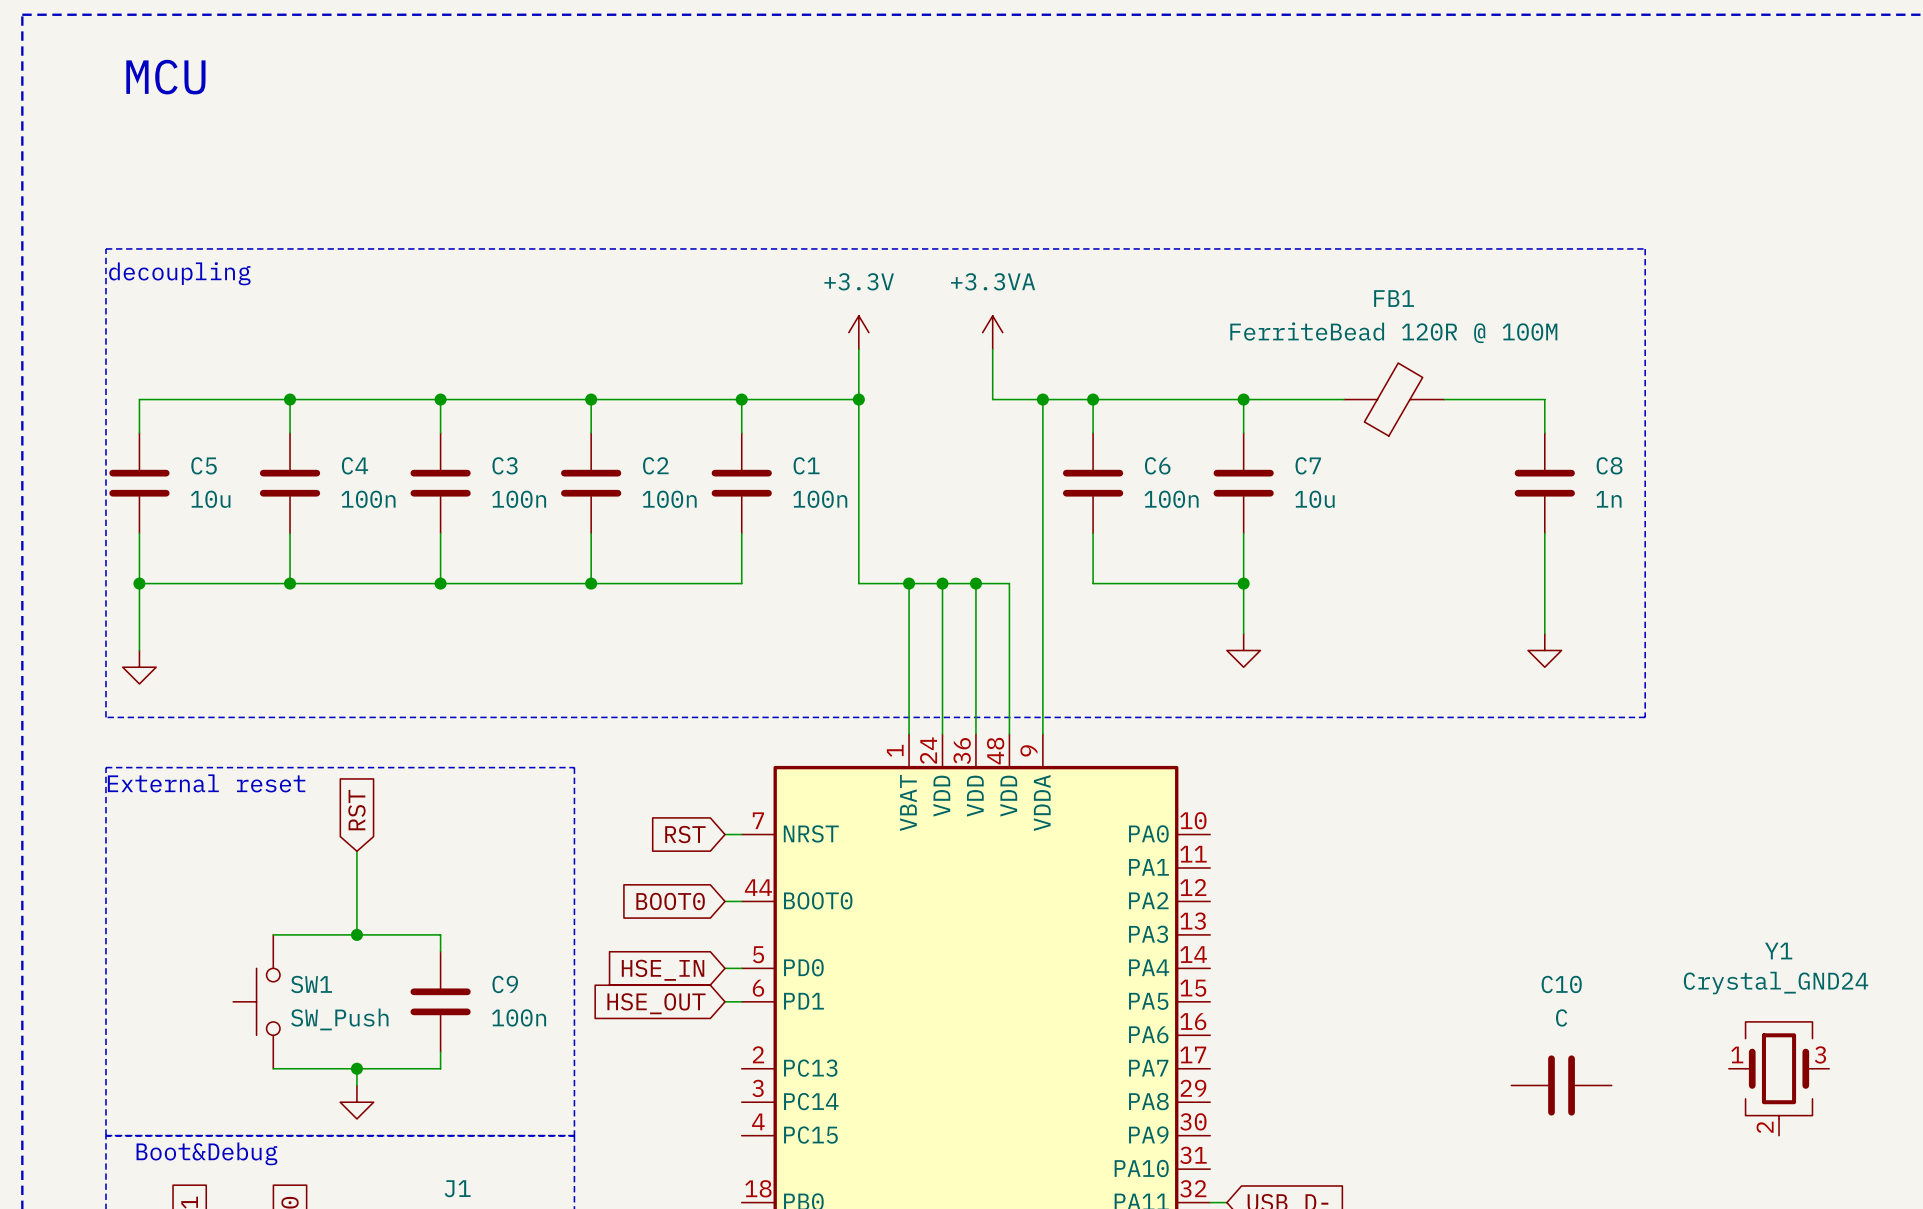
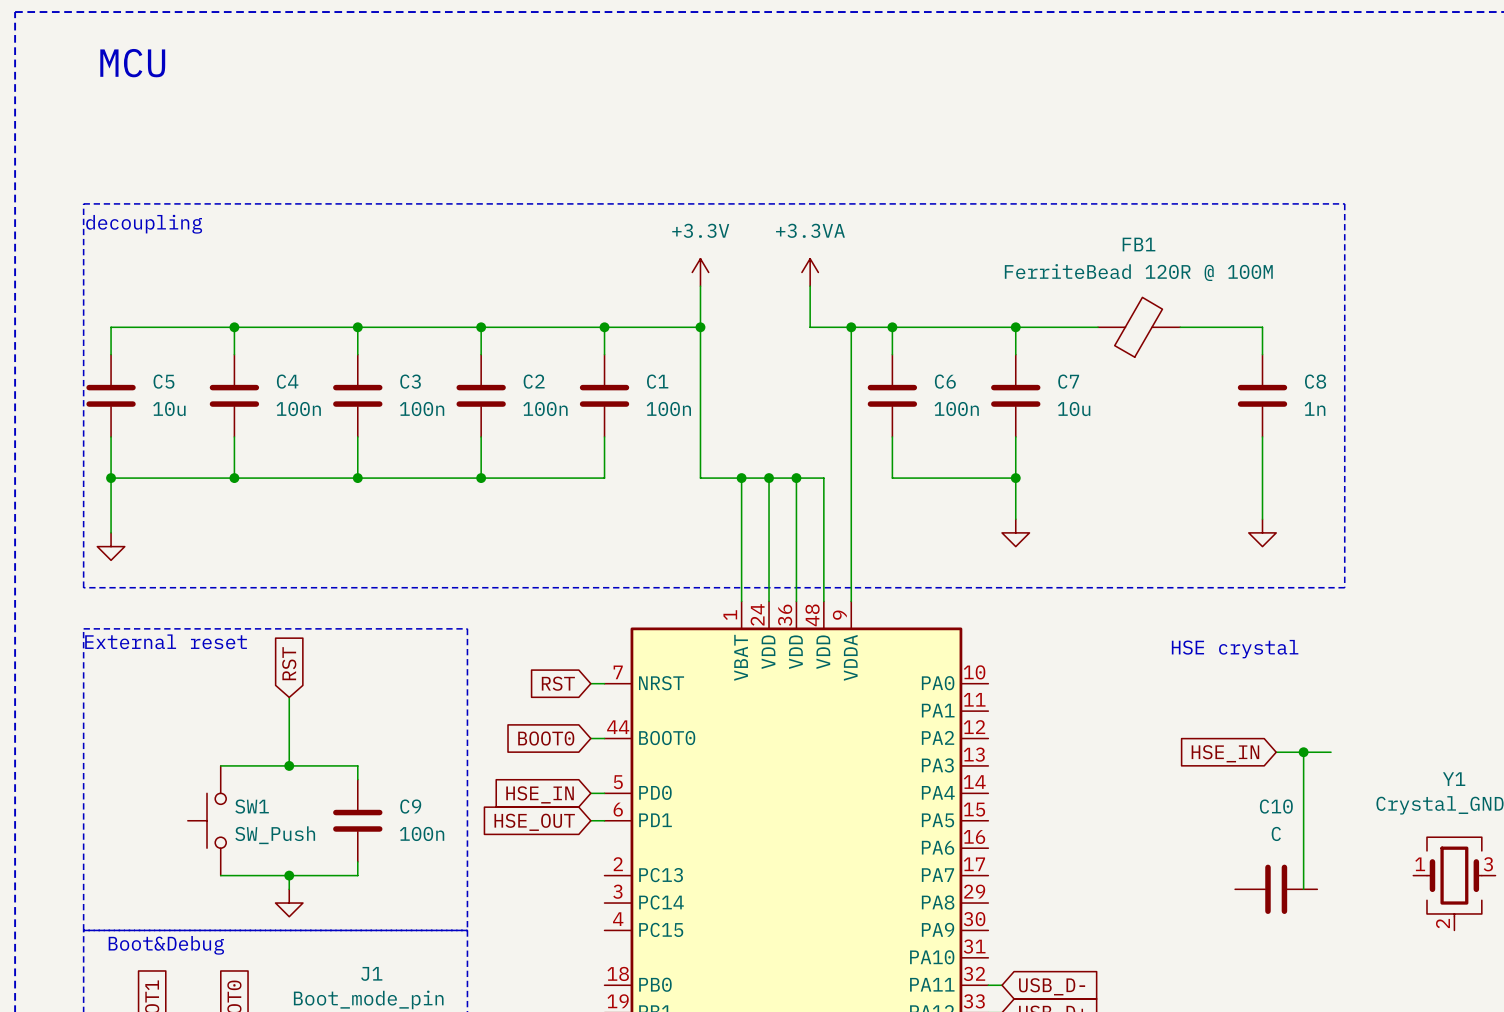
text: none -> HSE crystal (1235, 649)
wire: none -> (1276, 752) (1331, 752)
wire: none -> (1303, 752) (1303, 889)
junction: none -> (1303, 752)
global label: none -> HSE_IN (1225, 753)

